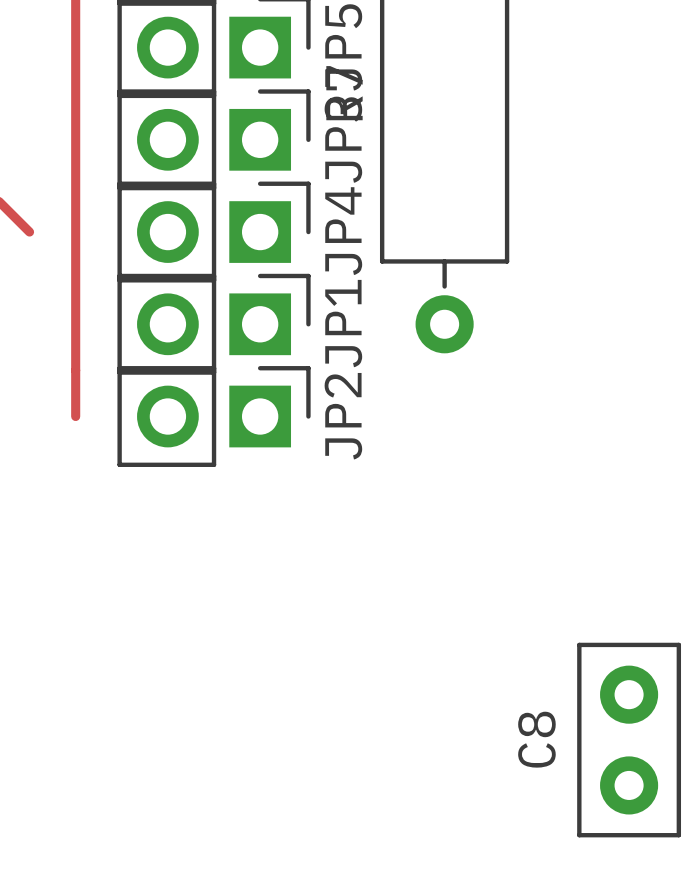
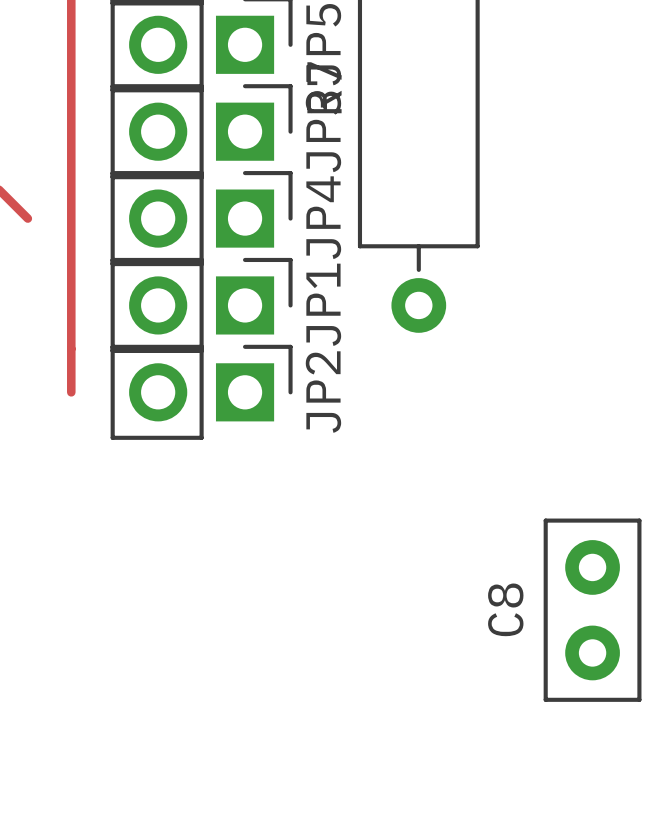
C8 position: (629, 740) -> (592, 610)

